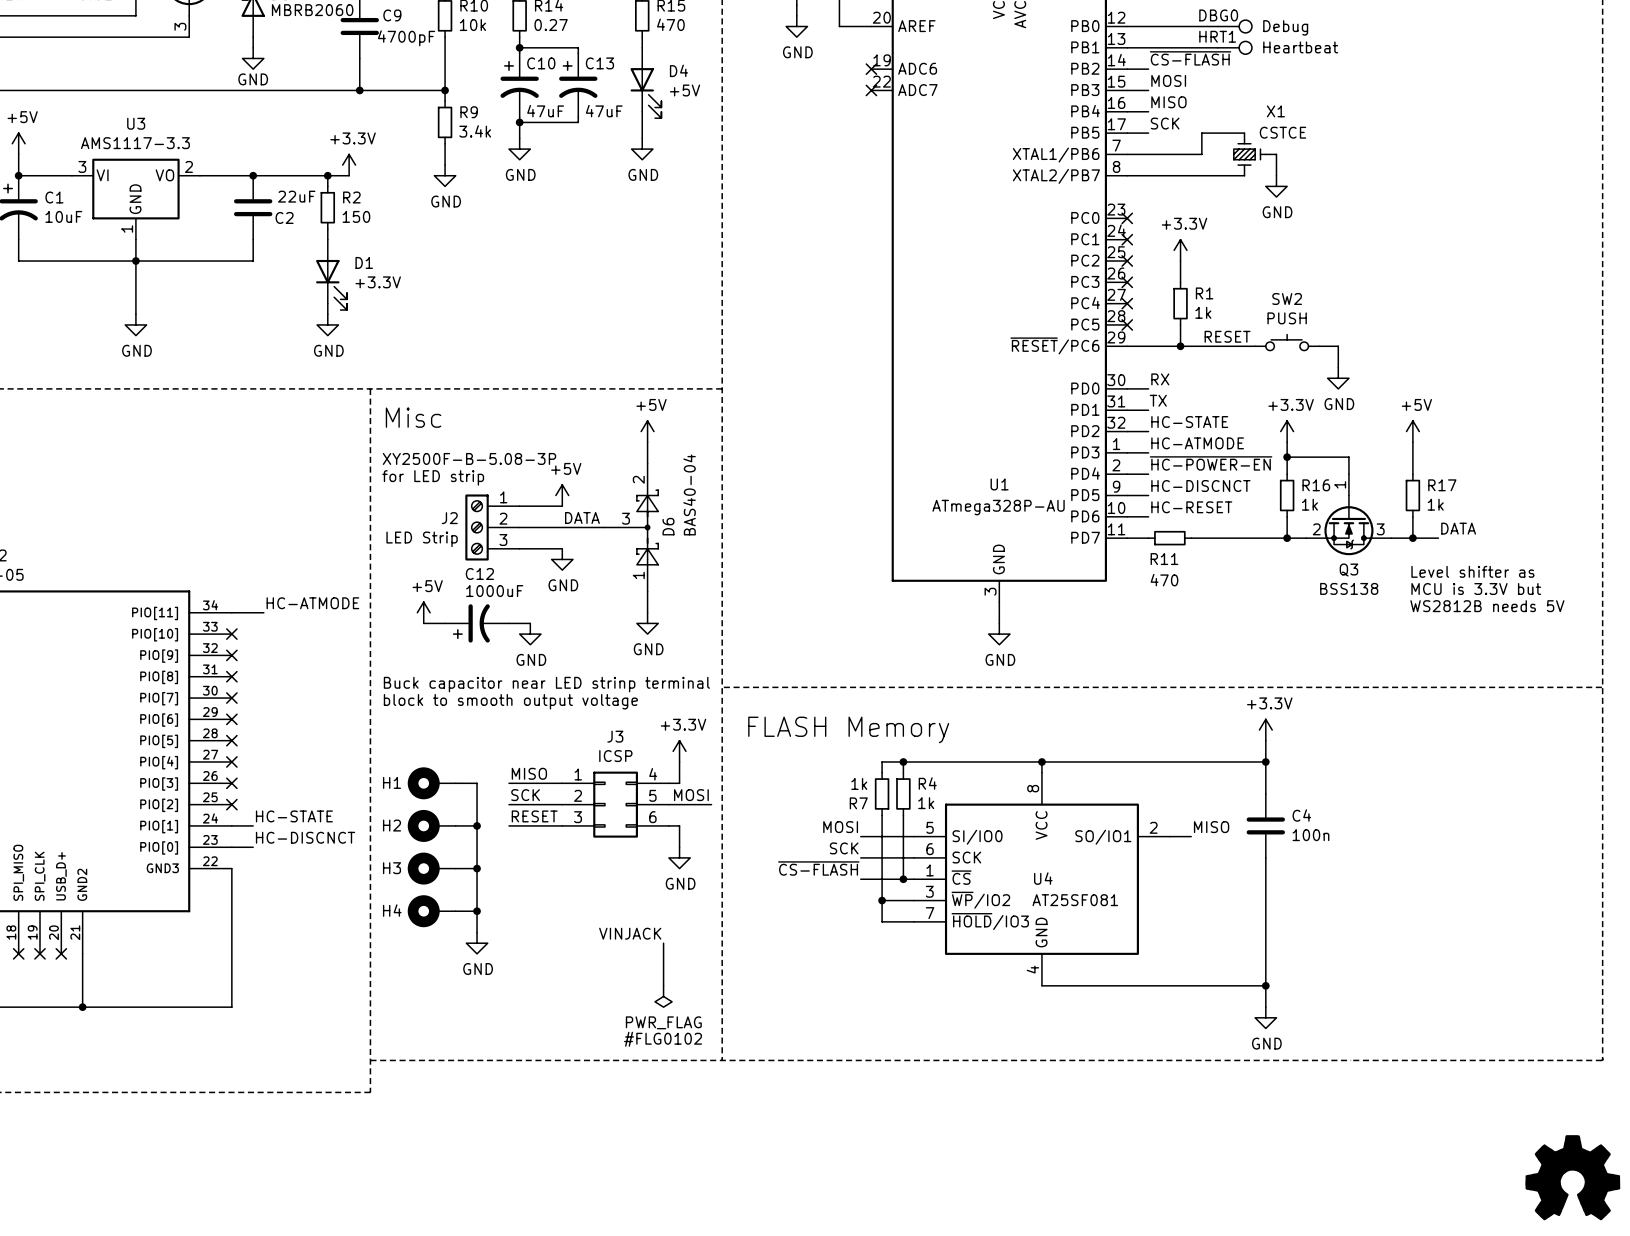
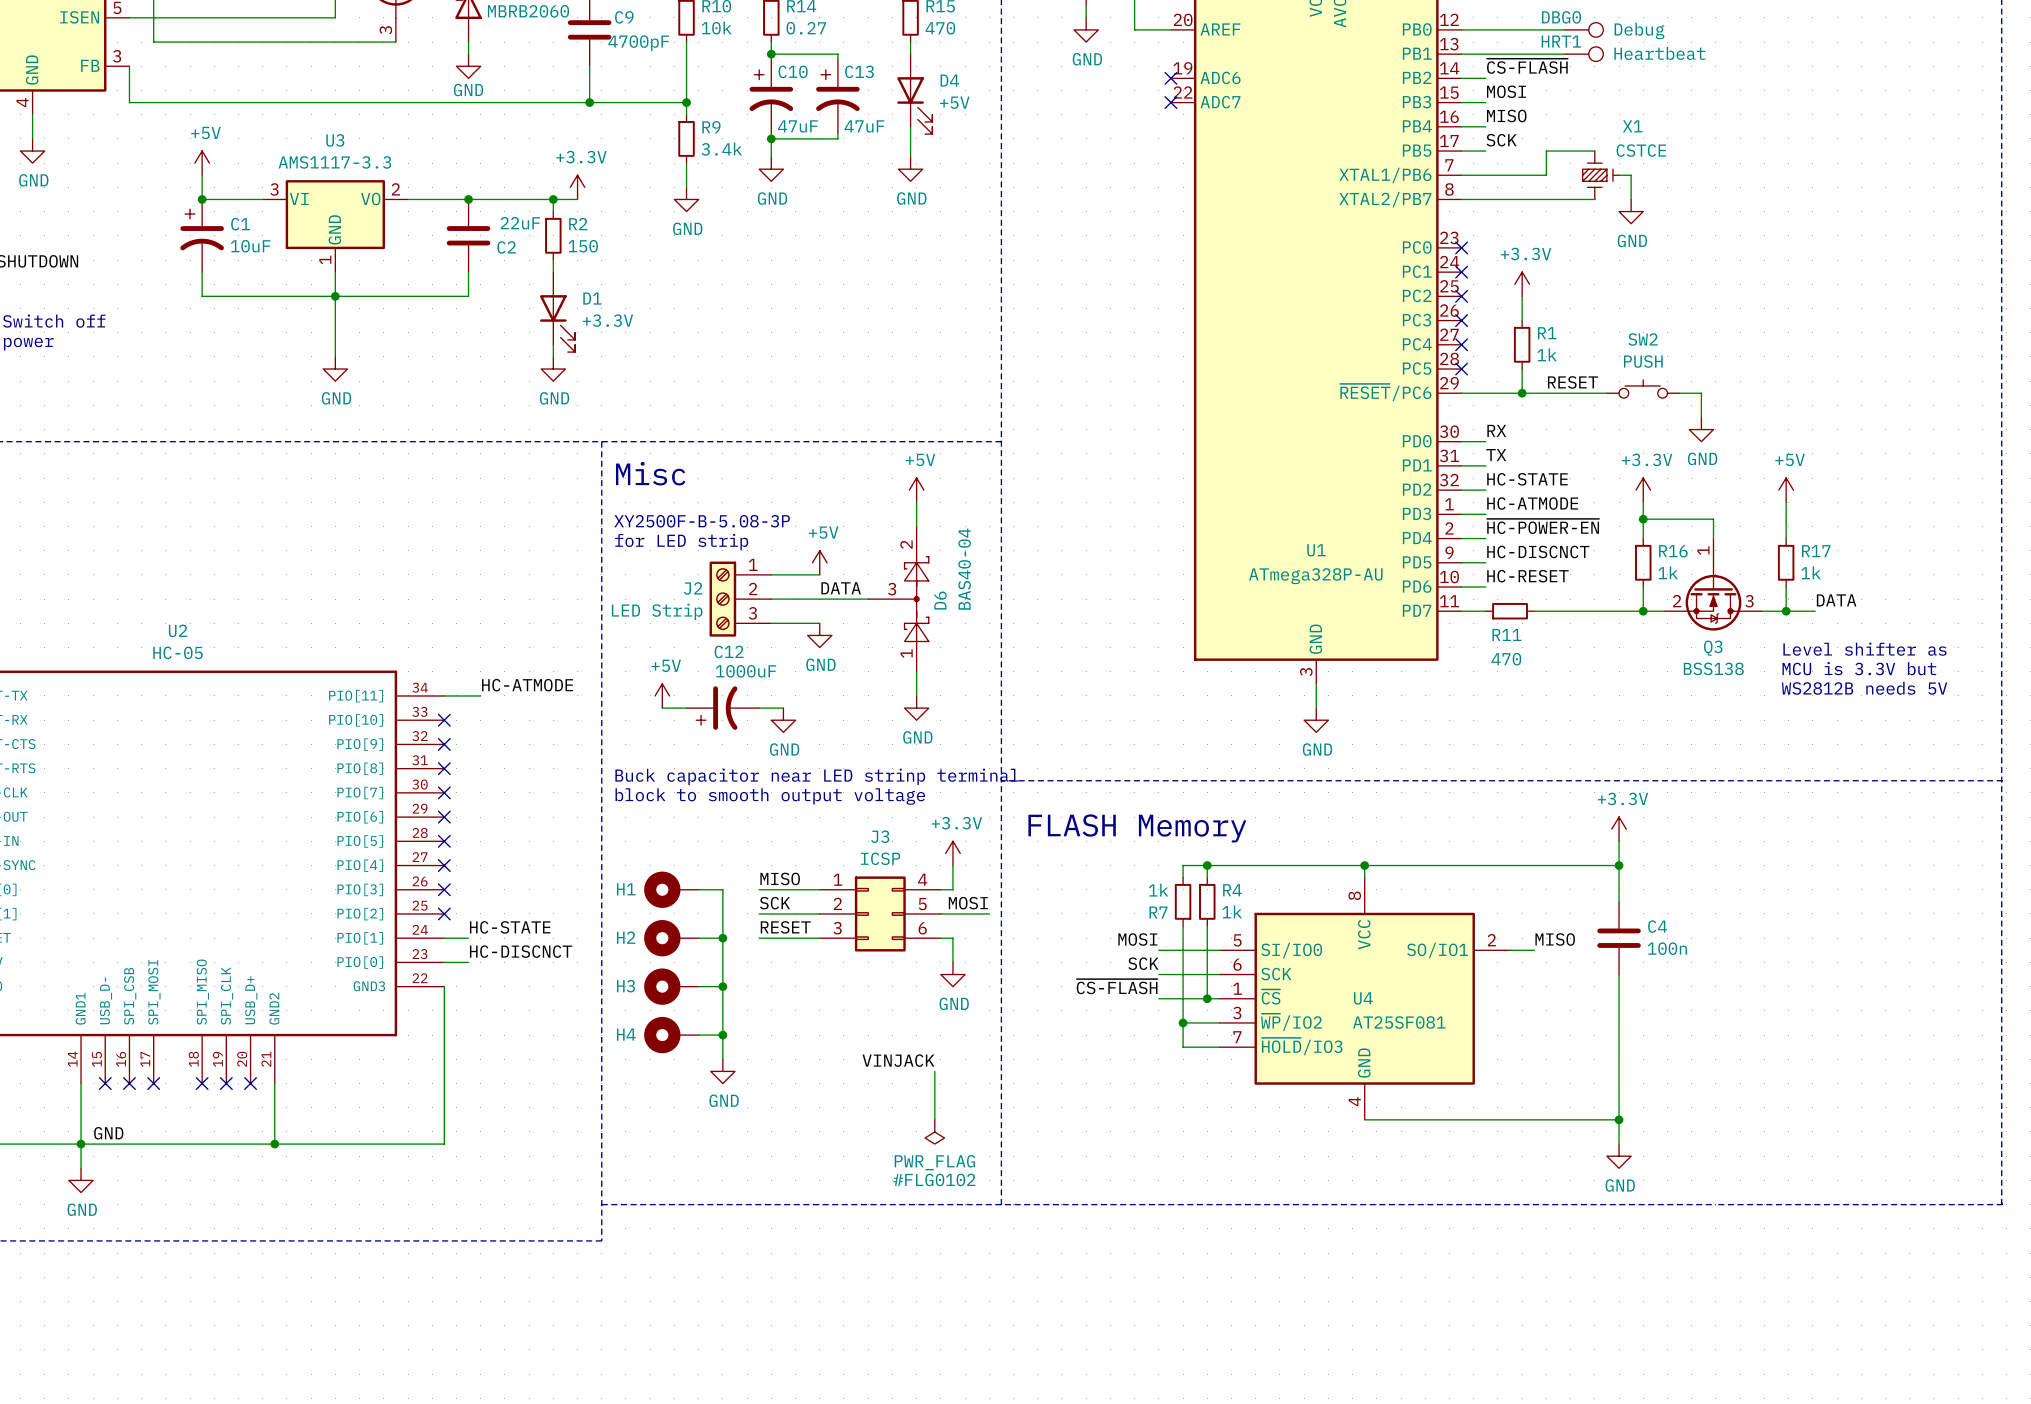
power symbol: (1572, 1177) -> none

